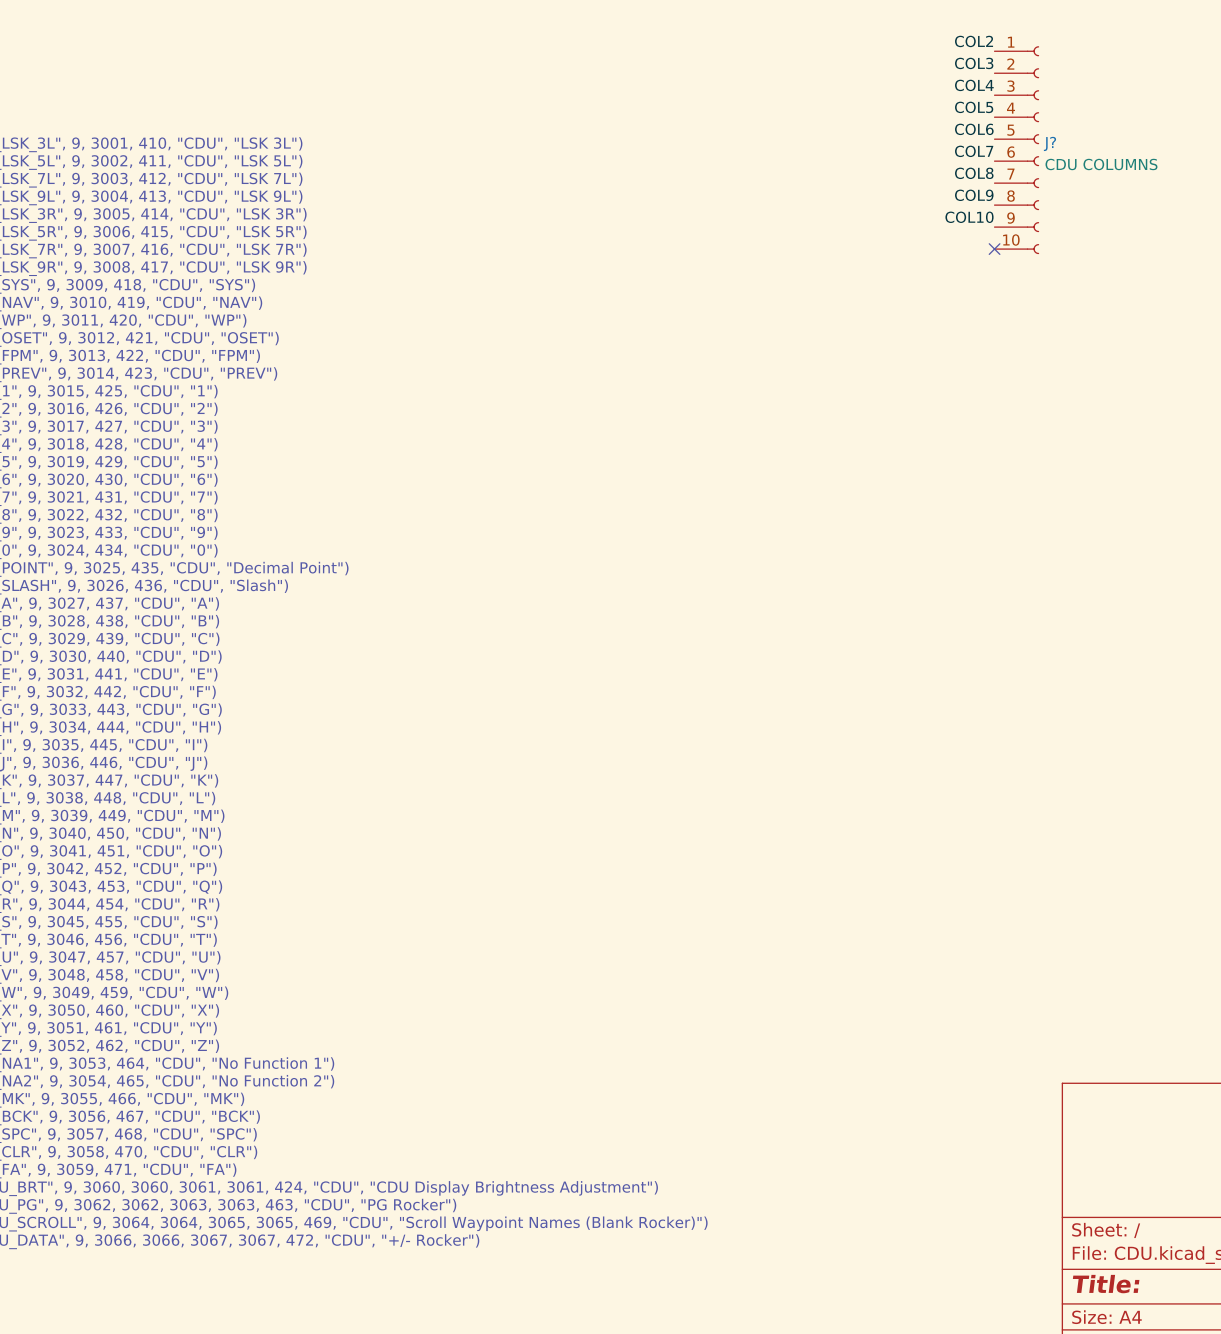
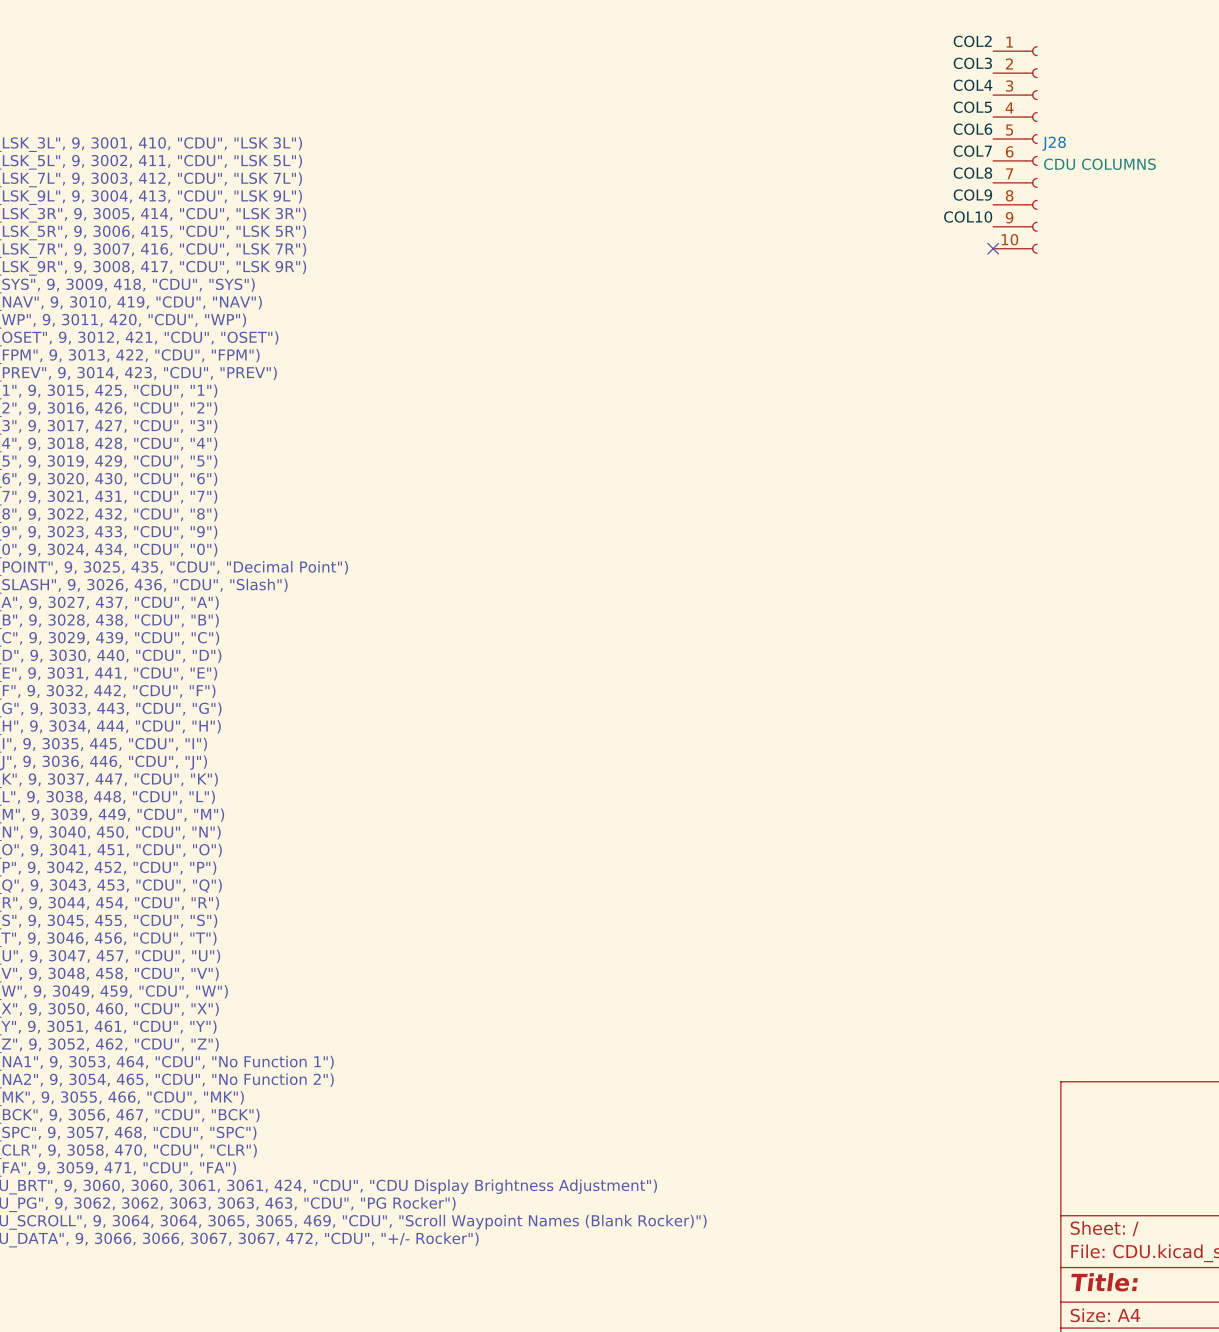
J? name: J? (1049, 143) -> J28 (1054, 143)

